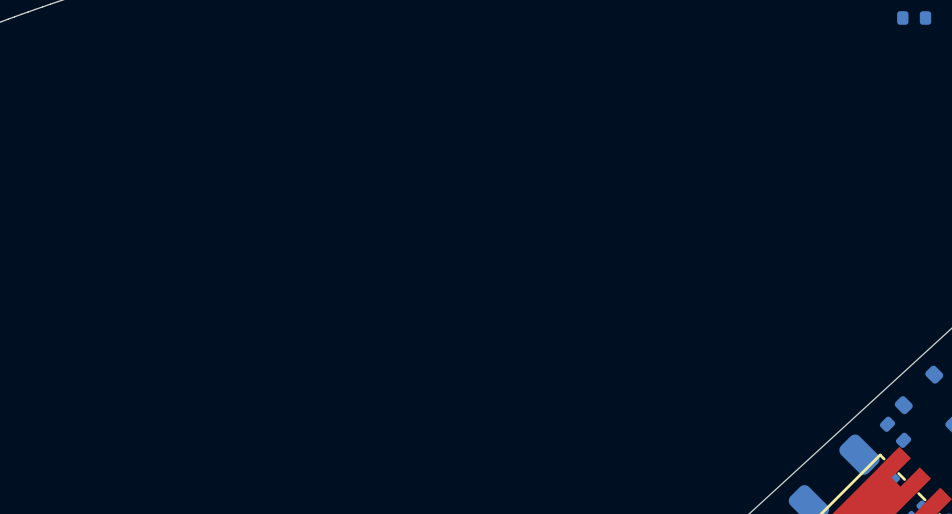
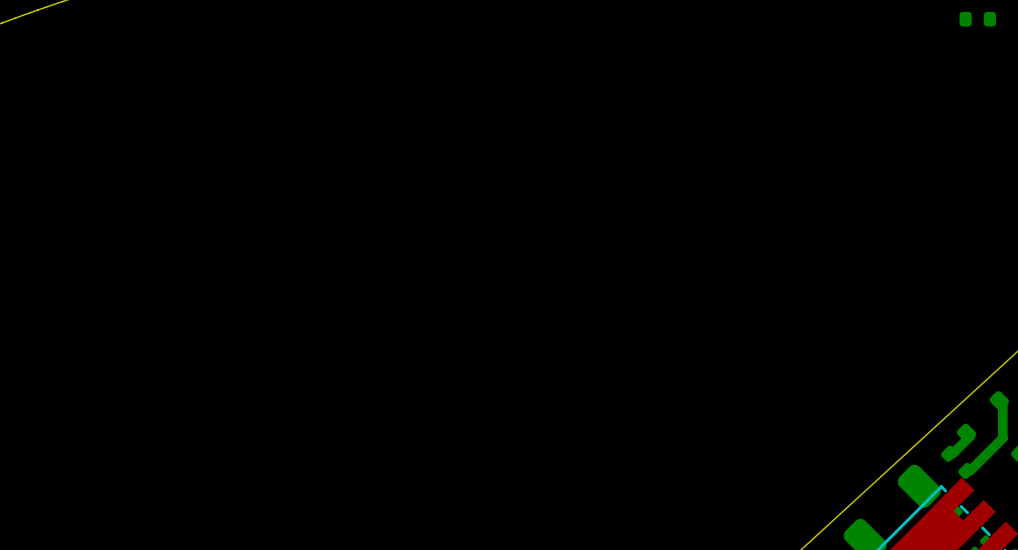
bottom track: none -> (1002, 400) (1002, 438)
bottom track: none -> (970, 436) (952, 453)
bottom track: none -> (1002, 438) (970, 470)

